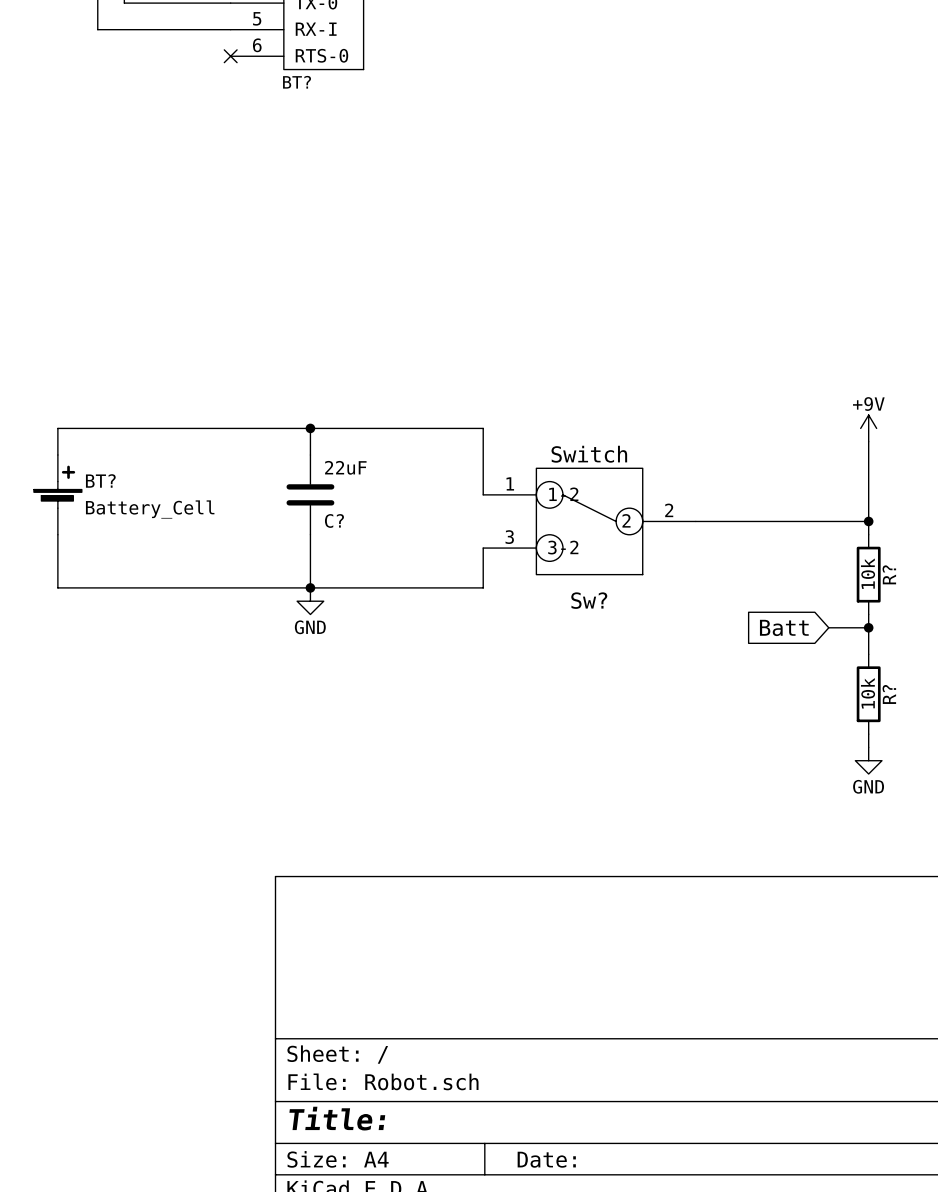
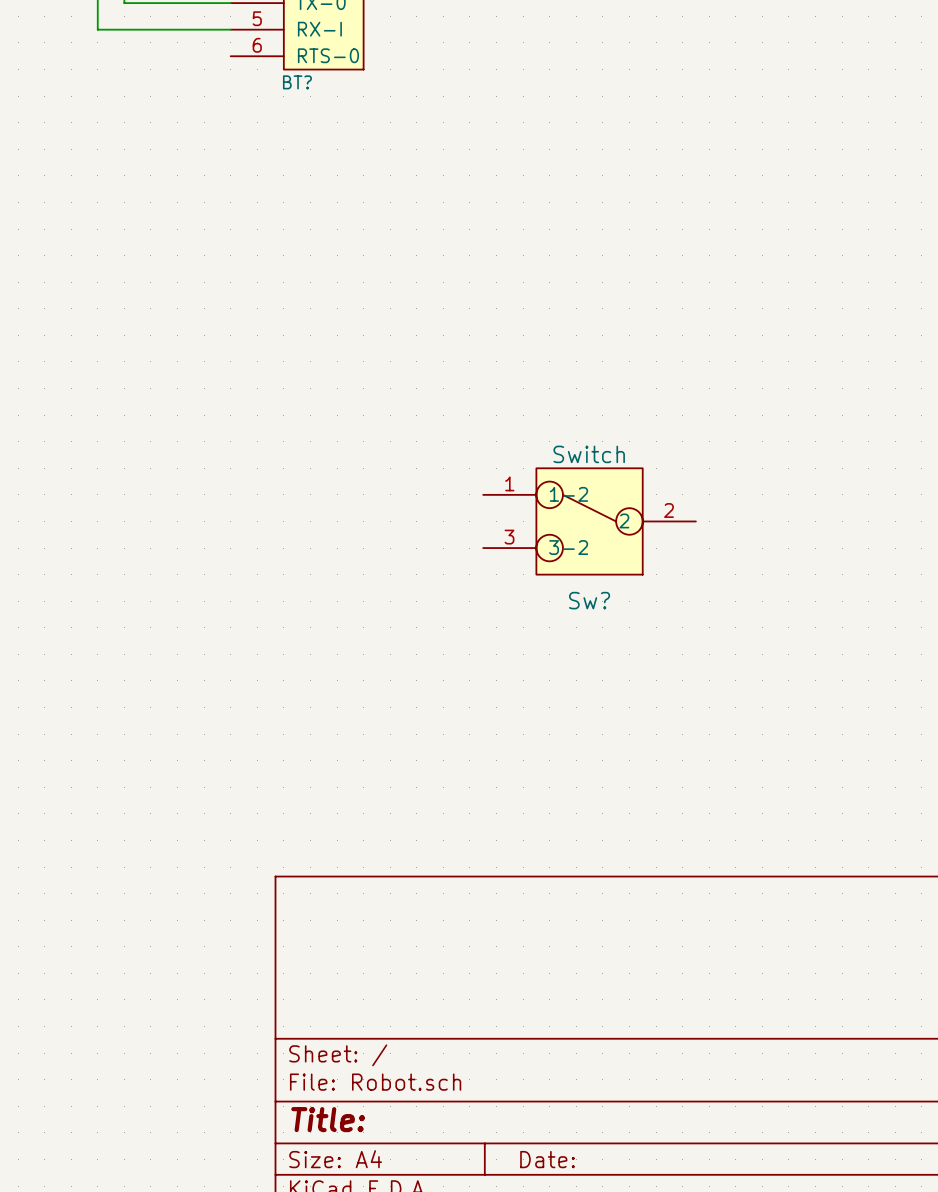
no-connect mark: (230, 56) -> none
wire: (310, 428) (310, 455) -> none
junction: (310, 428) -> none
power symbol: +9V (868, 428) -> none
wire: (868, 441) (868, 534) -> none
wire: (57, 455) (57, 428) (483, 428) (483, 494) -> none
BT?: Battery_Cell (57, 494) -> none
C?: 22uF (310, 494) -> none
wire: (695, 521) (868, 521) -> none
junction: (868, 521) -> none
wire: (57, 534) (57, 587) (483, 587) (483, 548) -> none
wire: (310, 534) (310, 587) -> none
R?: 10k (868, 574) -> none
junction: (310, 587) -> none
power symbol: GND (310, 601) -> none
wire: (868, 614) (868, 654) -> none
global label: Batt (784, 627) -> none
wire: (828, 627) (868, 627) -> none
junction: (868, 627) -> none
R?: 10k (868, 694) -> none
wire: (868, 734) (868, 747) -> none
power symbol: GND (868, 760) -> none

